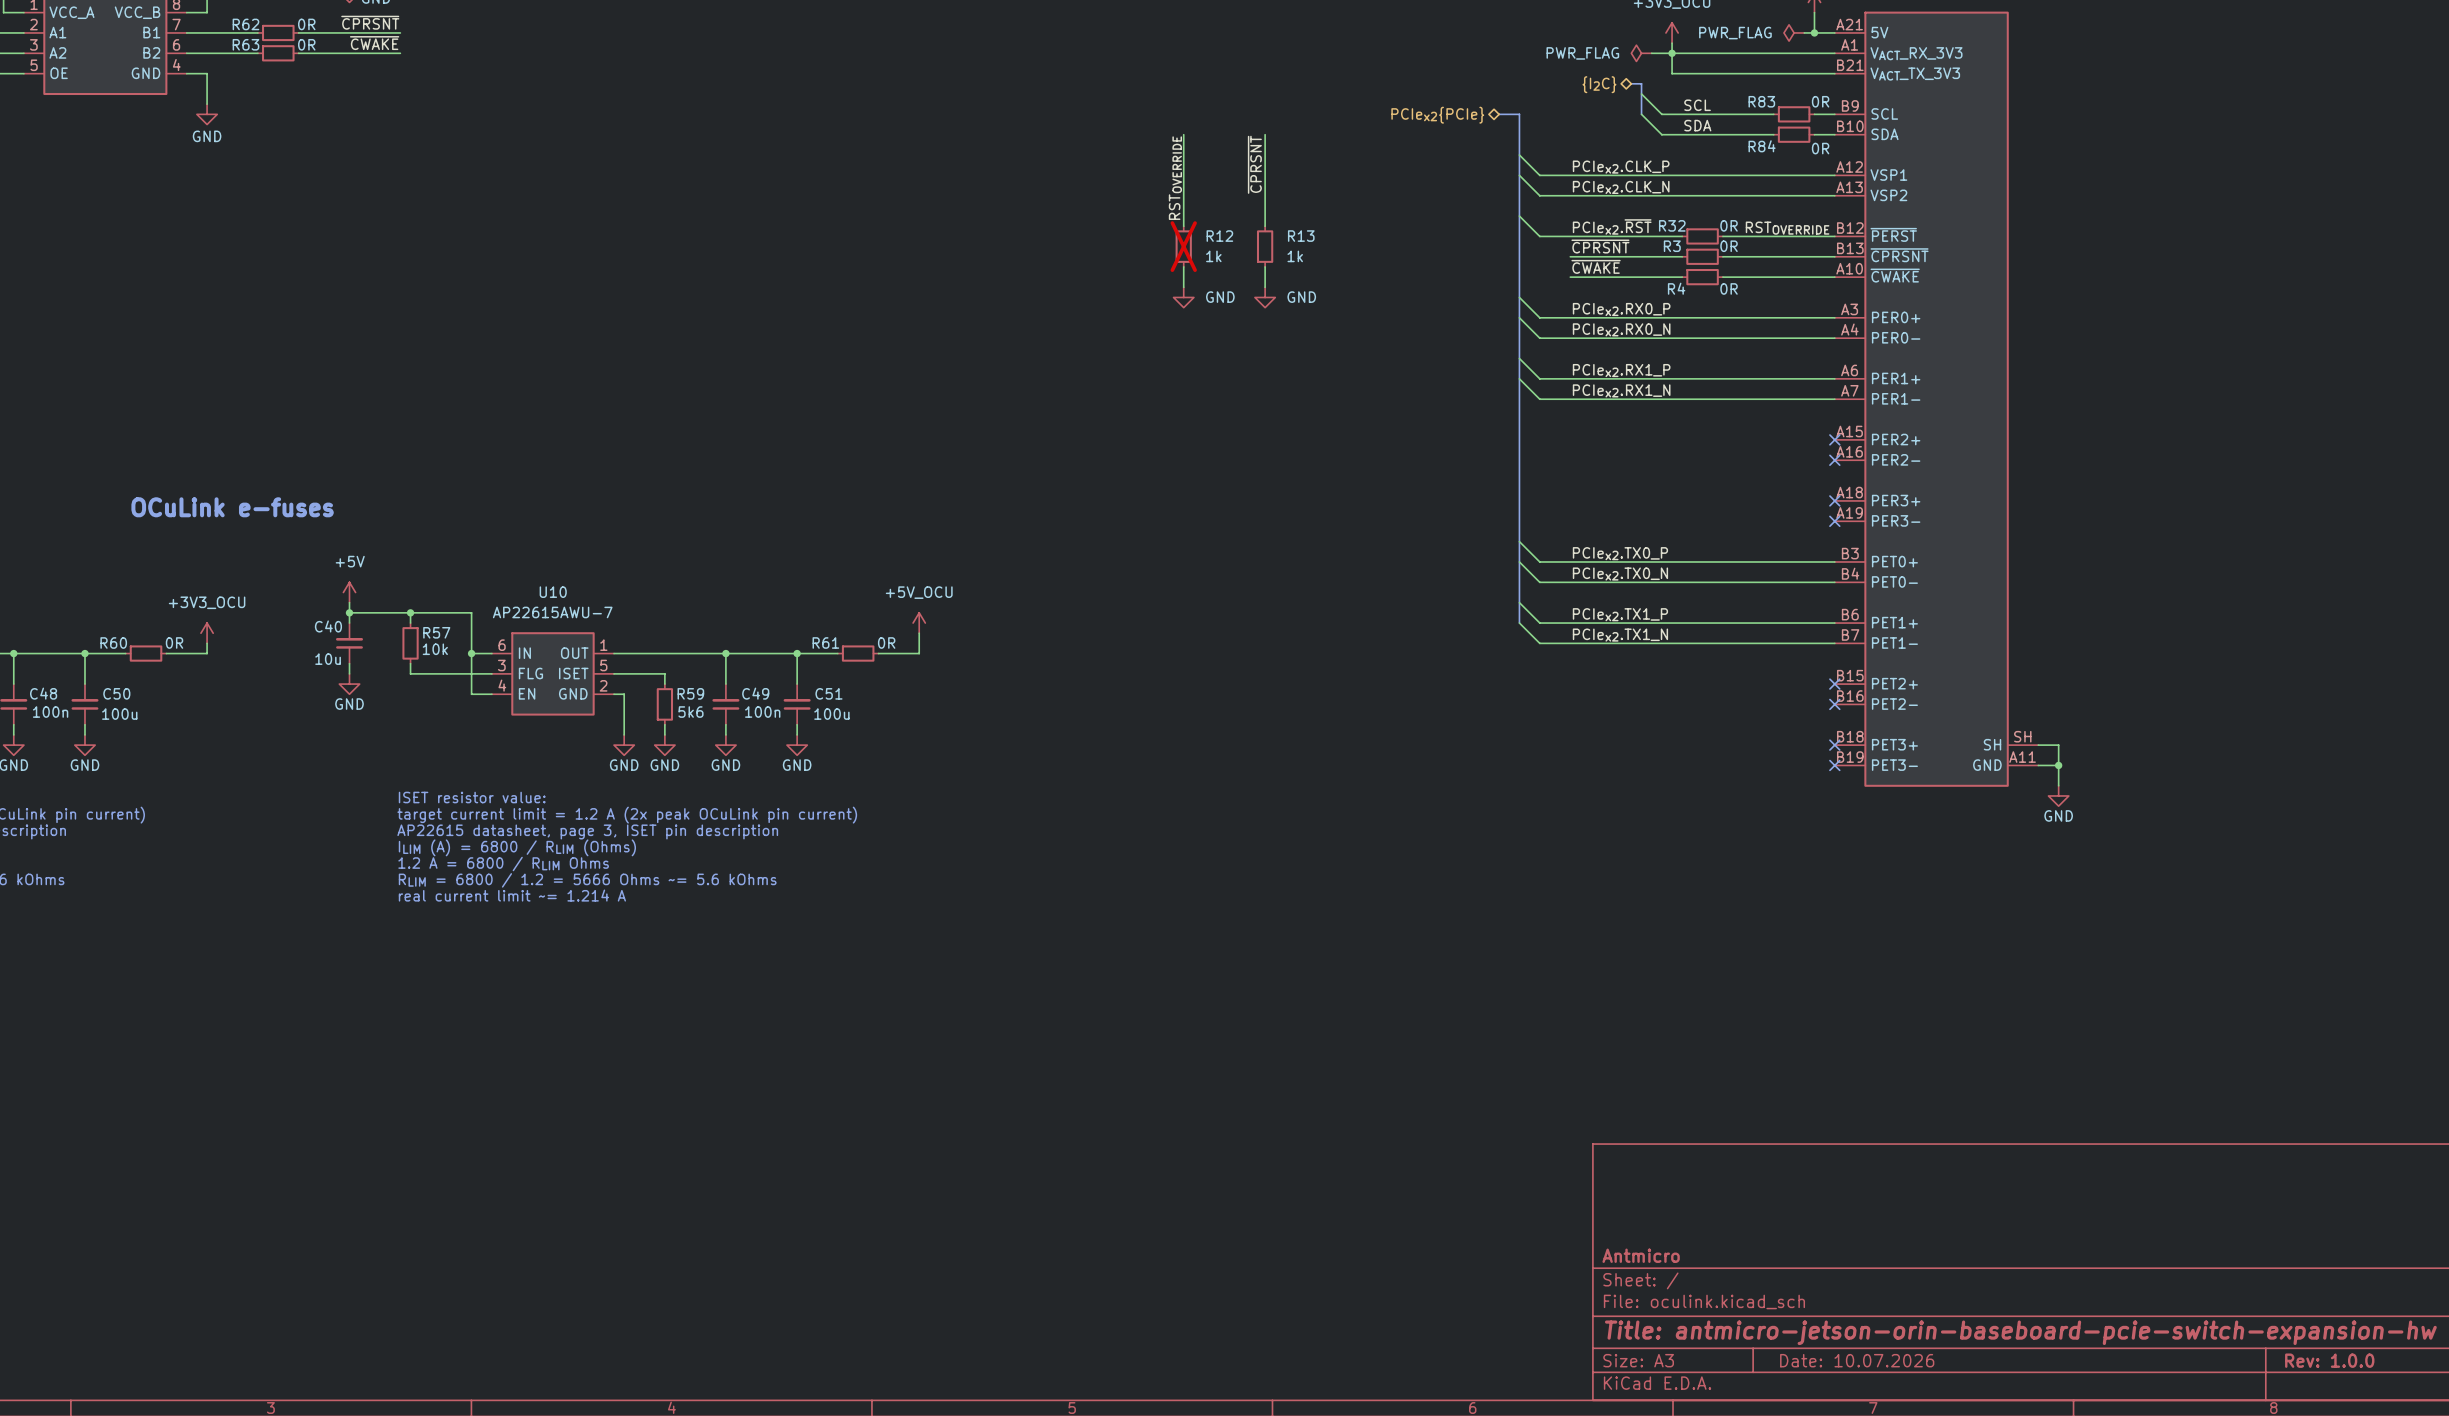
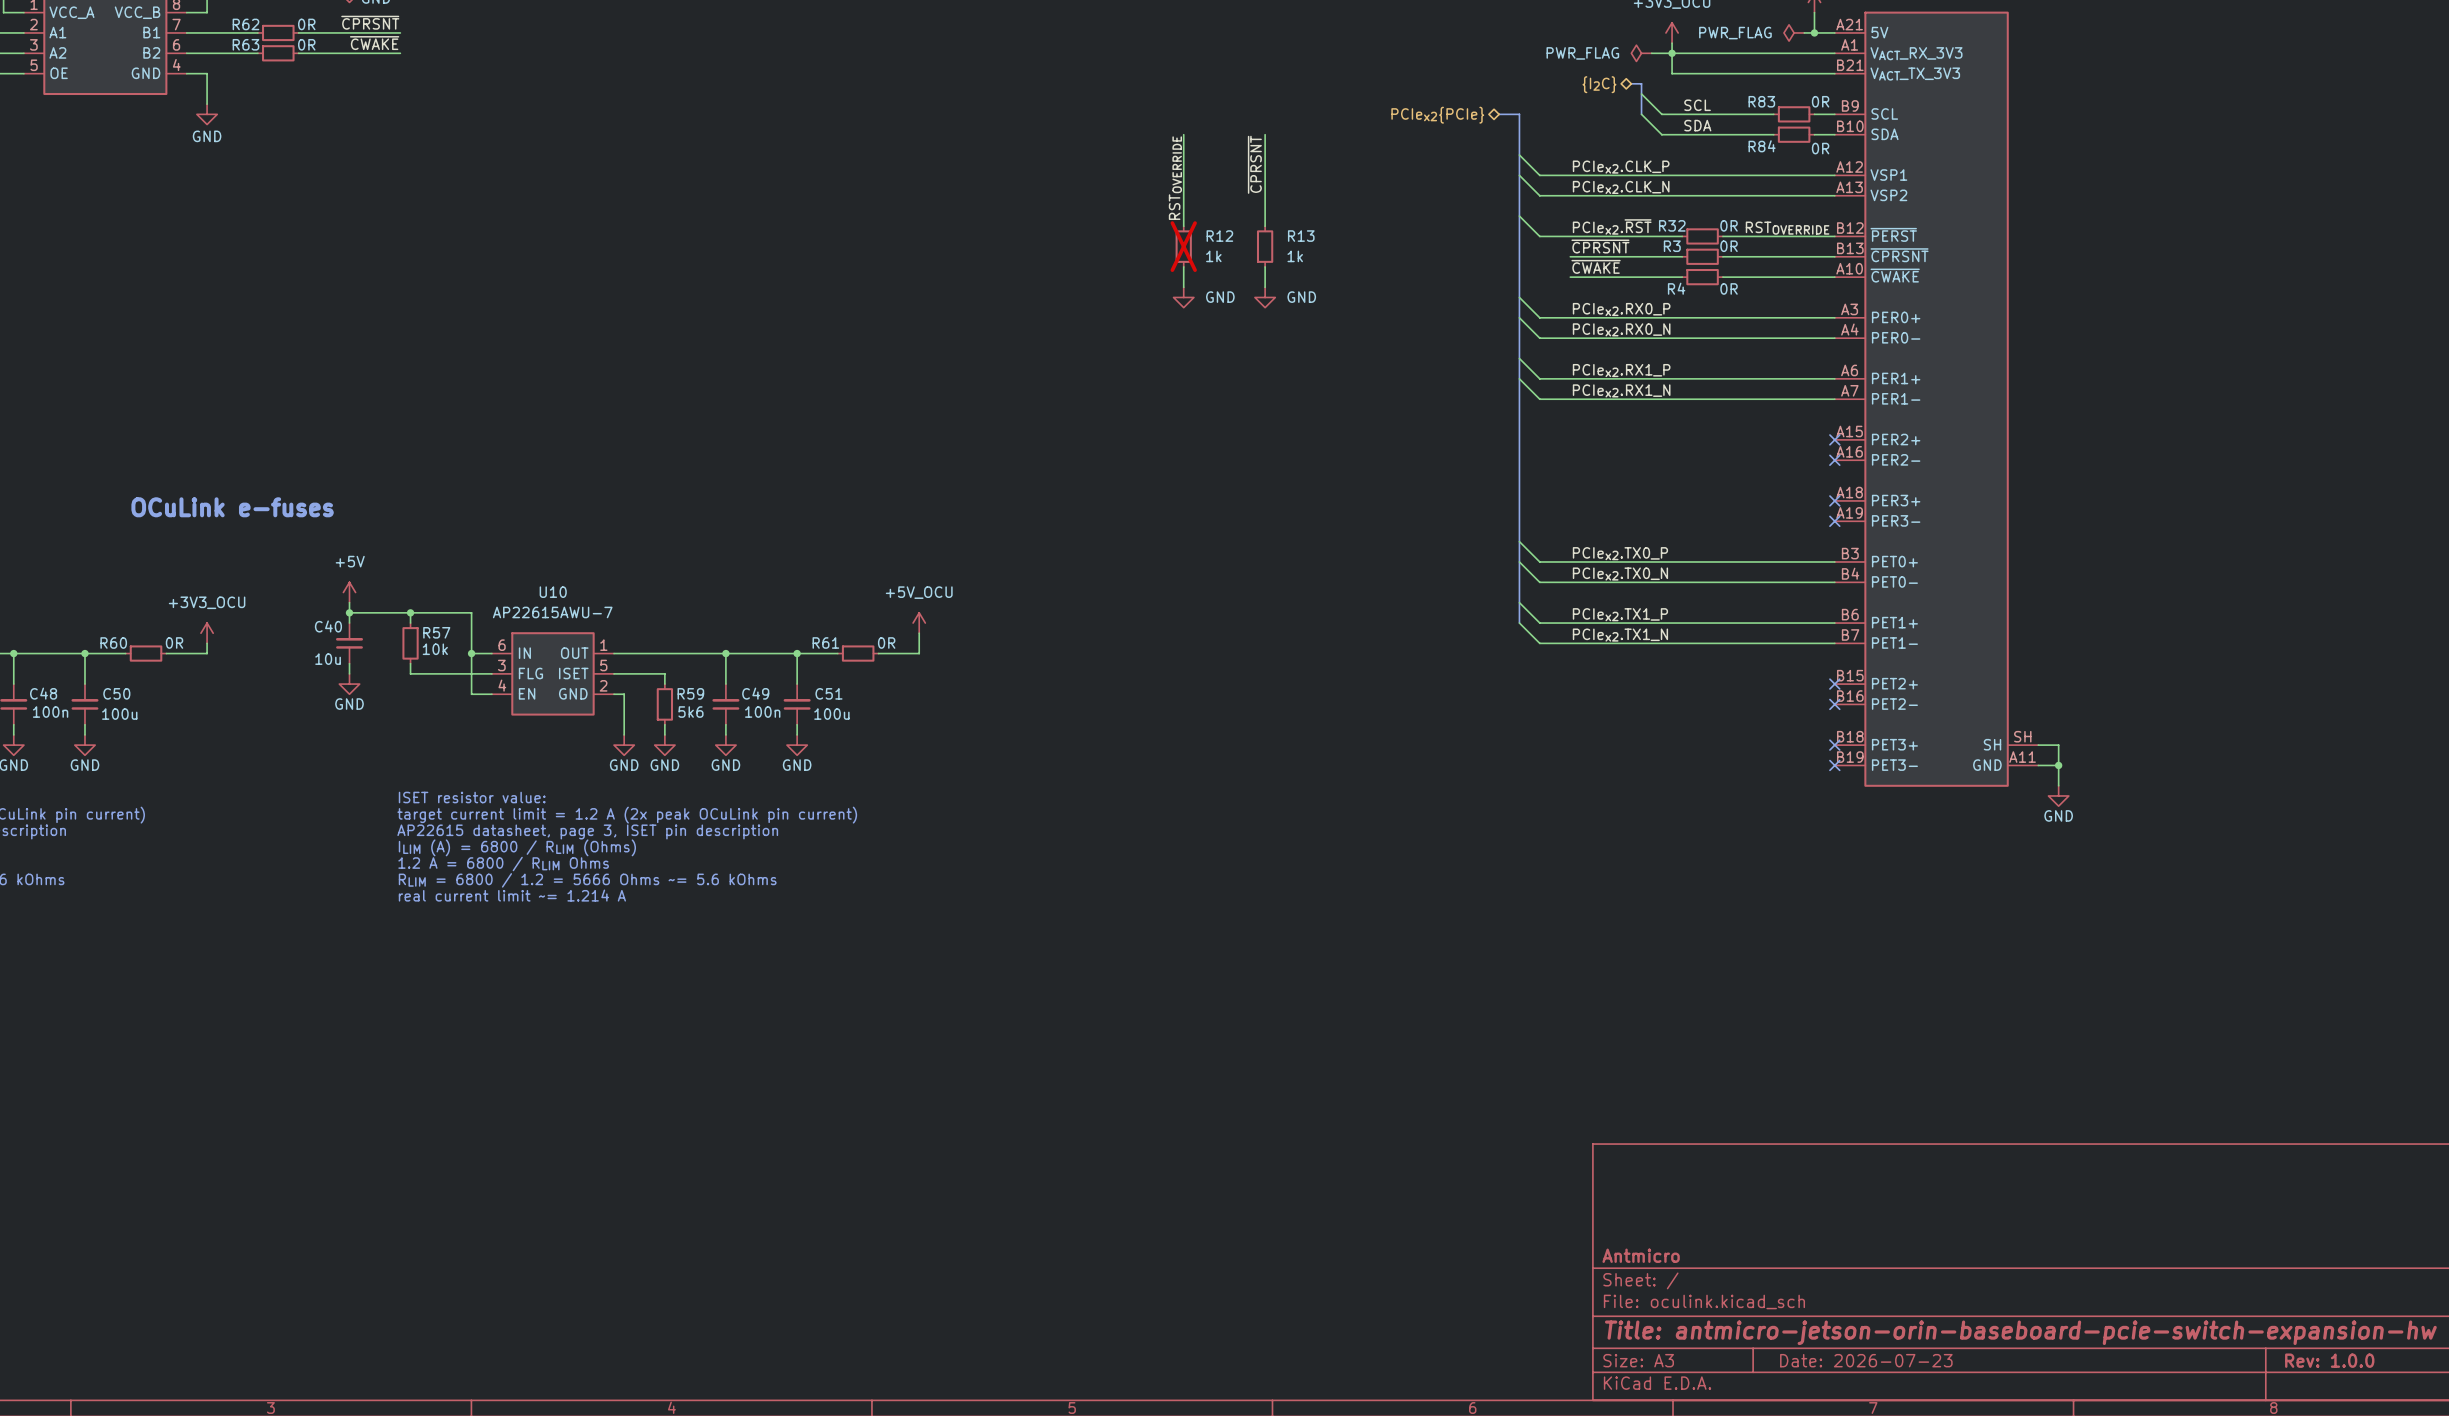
title block: Date: 10.07.2026 (1857, 1360) -> Date: 2026-07-23 (1866, 1360)

